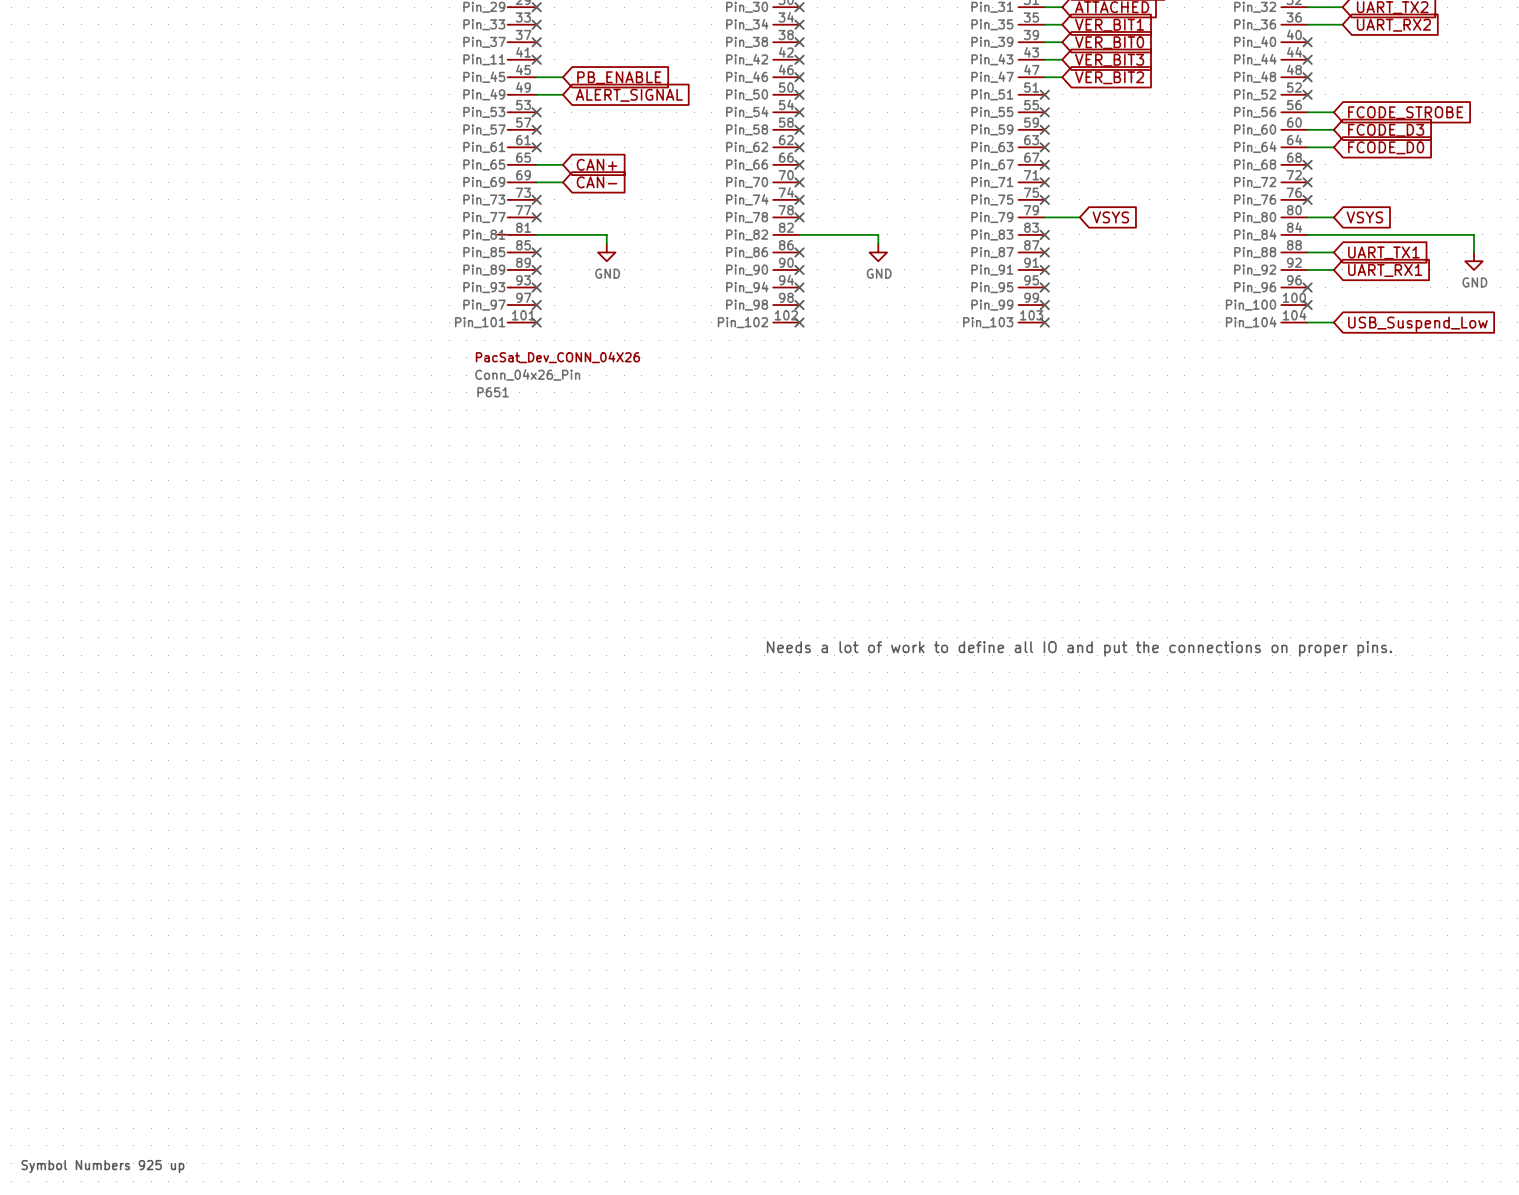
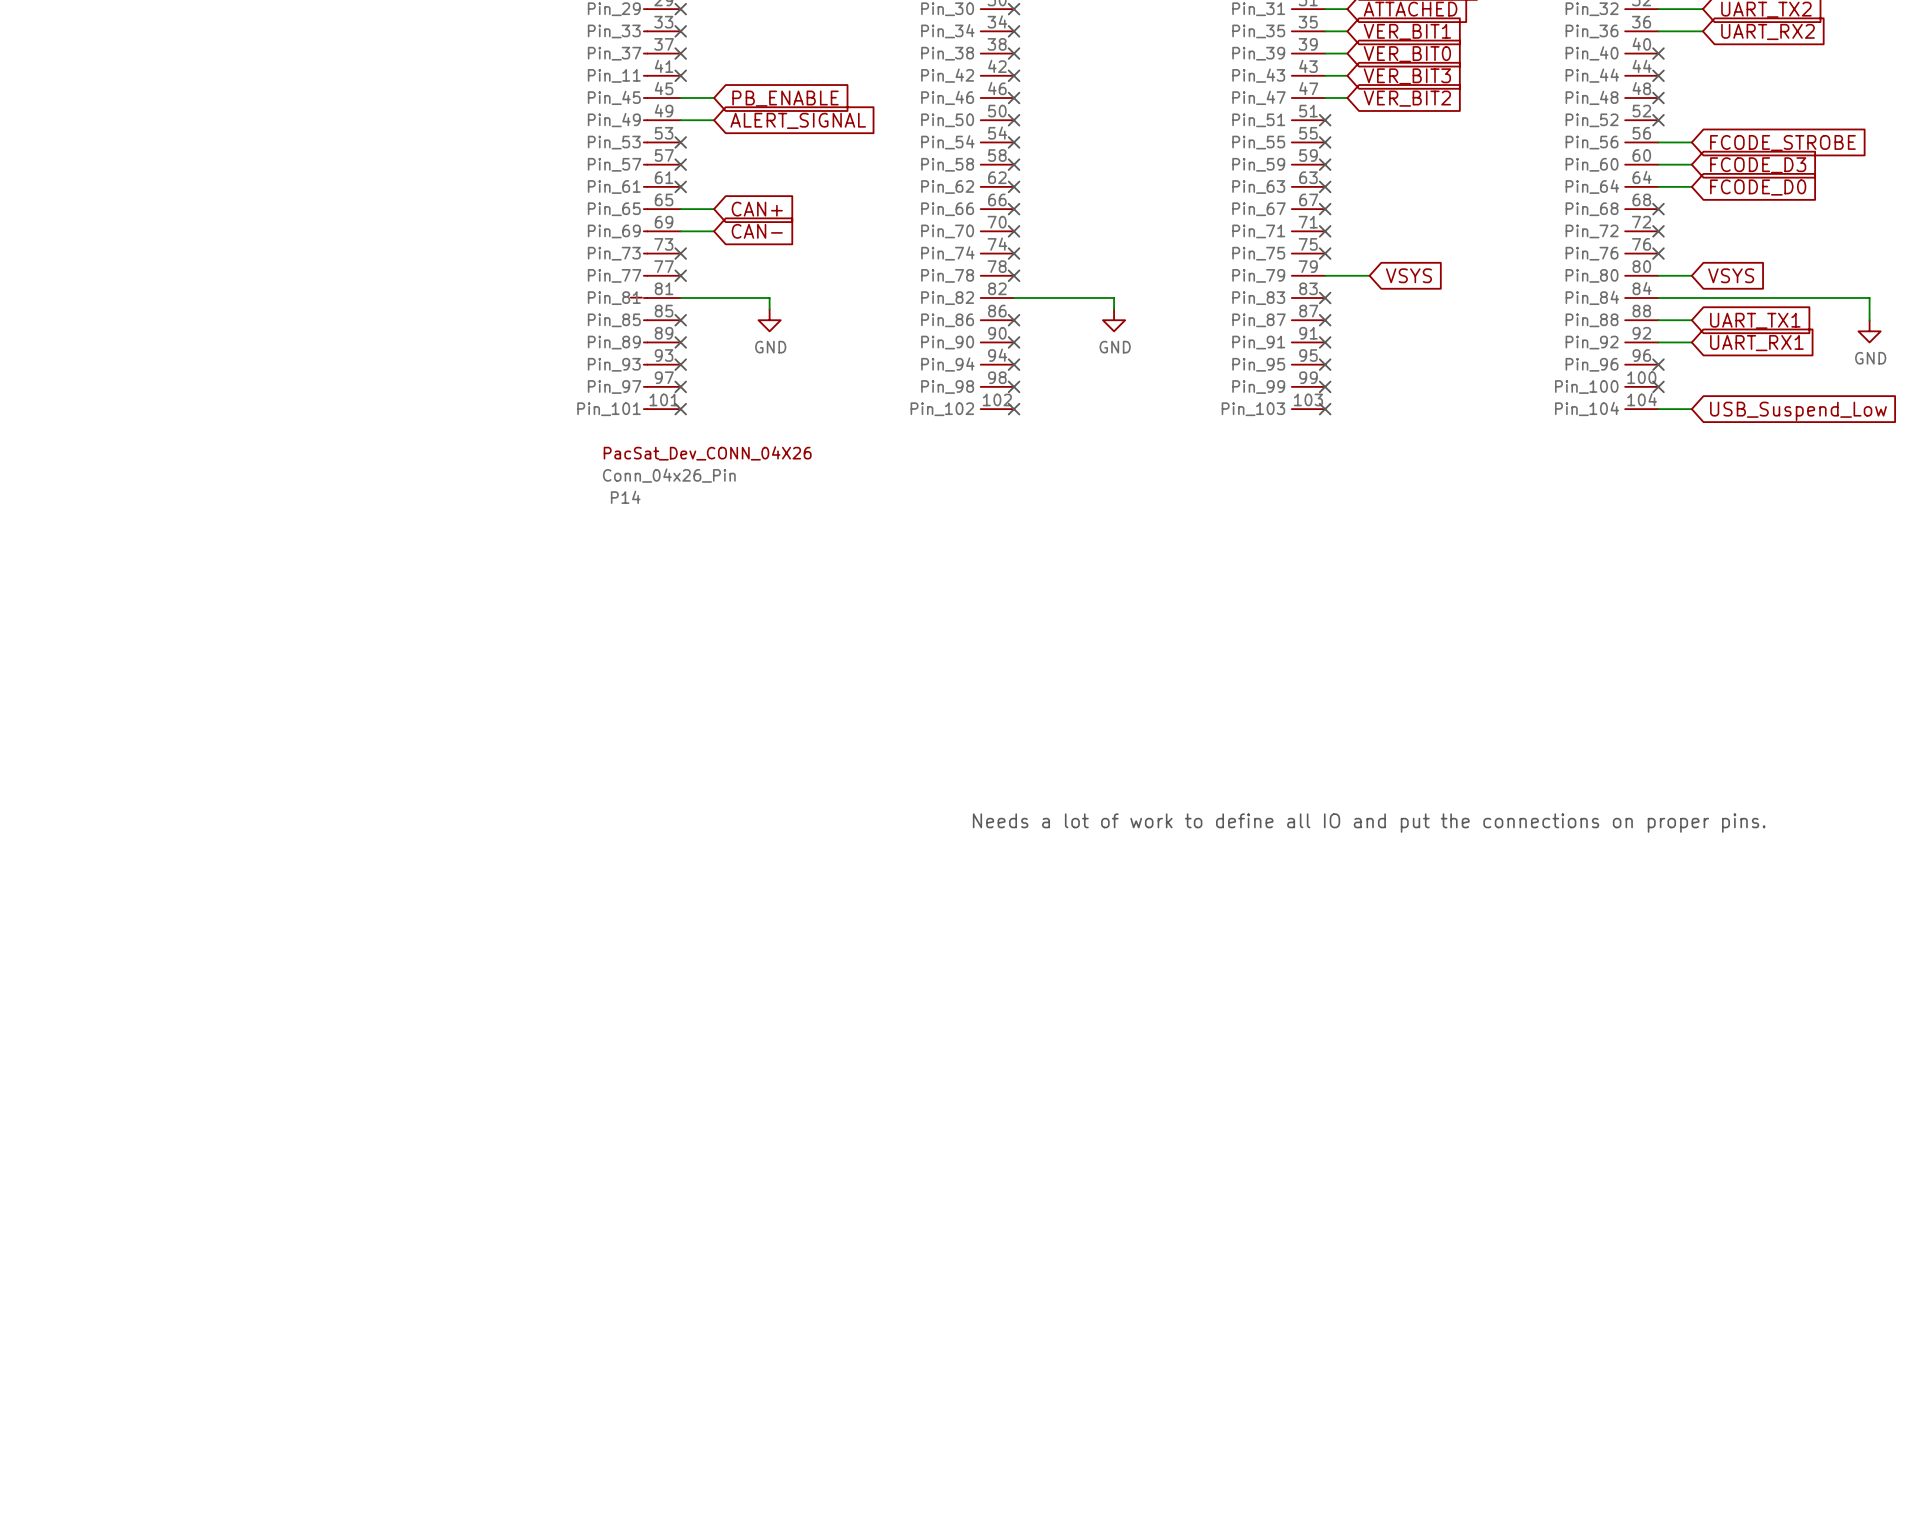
P651 name: P651 (493, 392) -> P14 (625, 497)
text: Symbol Numbers 925 up (102, 1166) -> none

